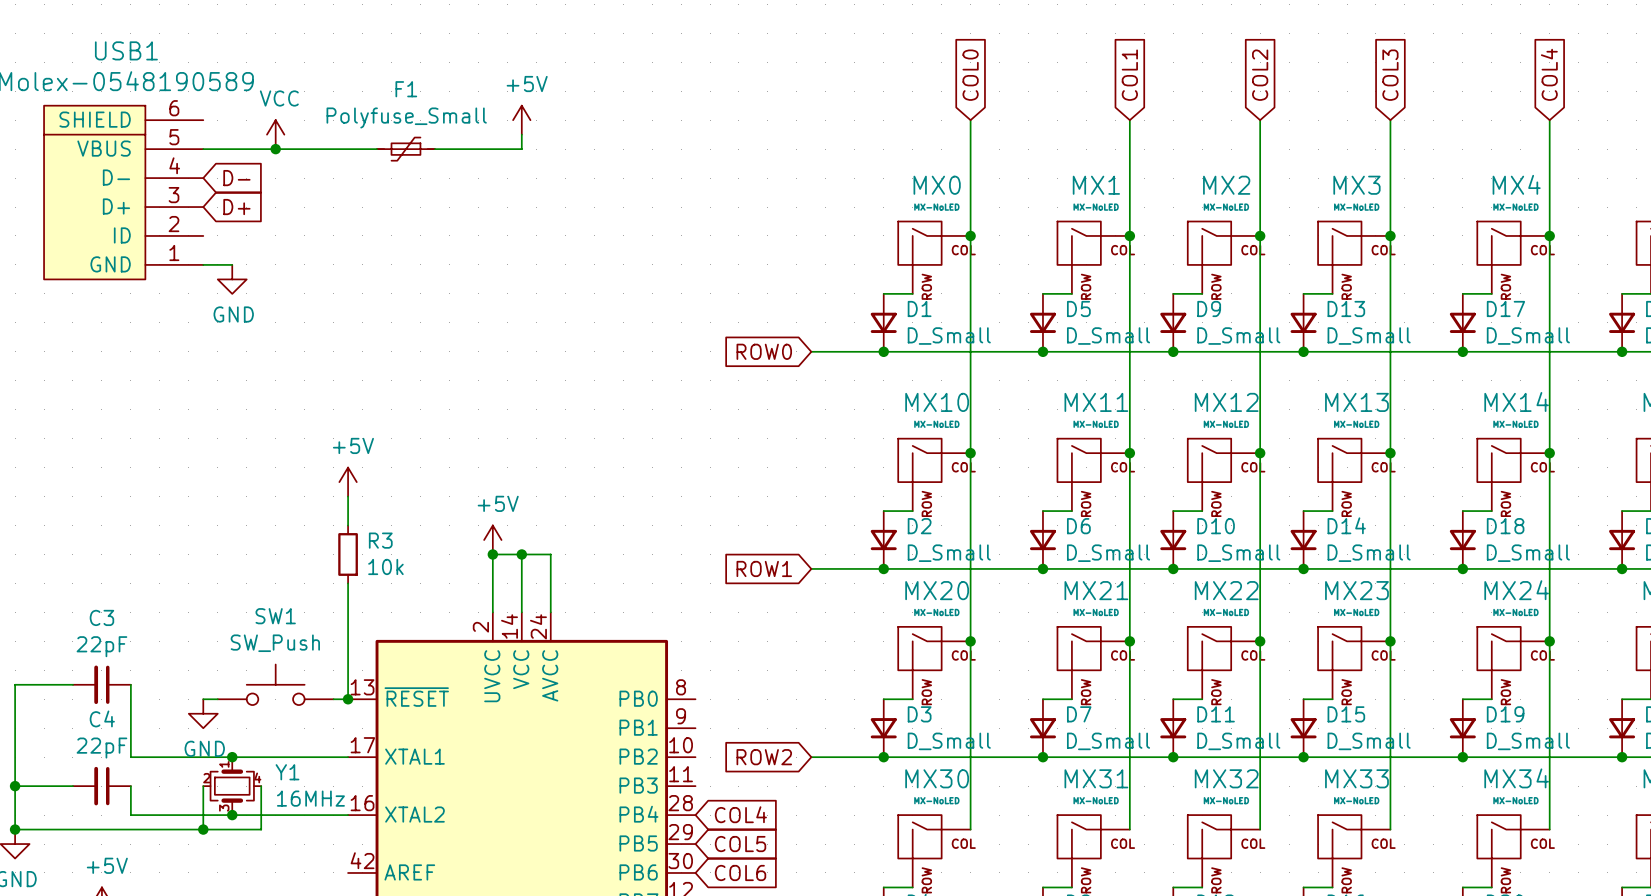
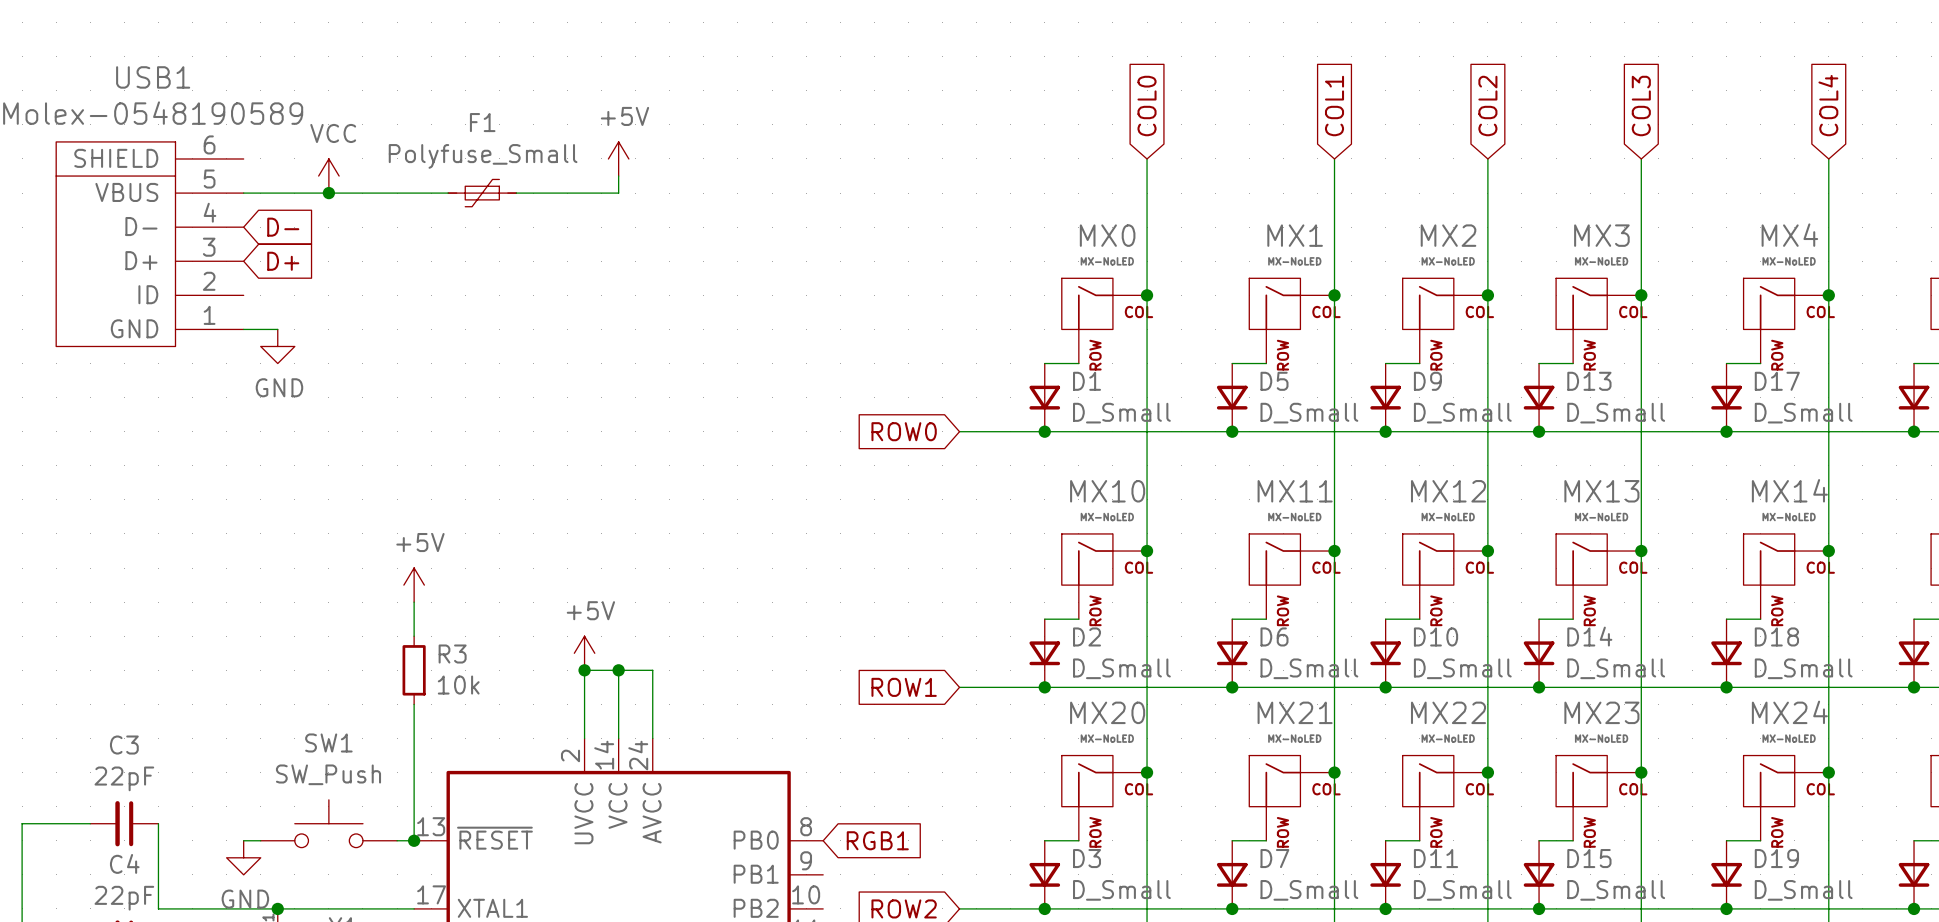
global label: none -> RGB1 (877, 840)

